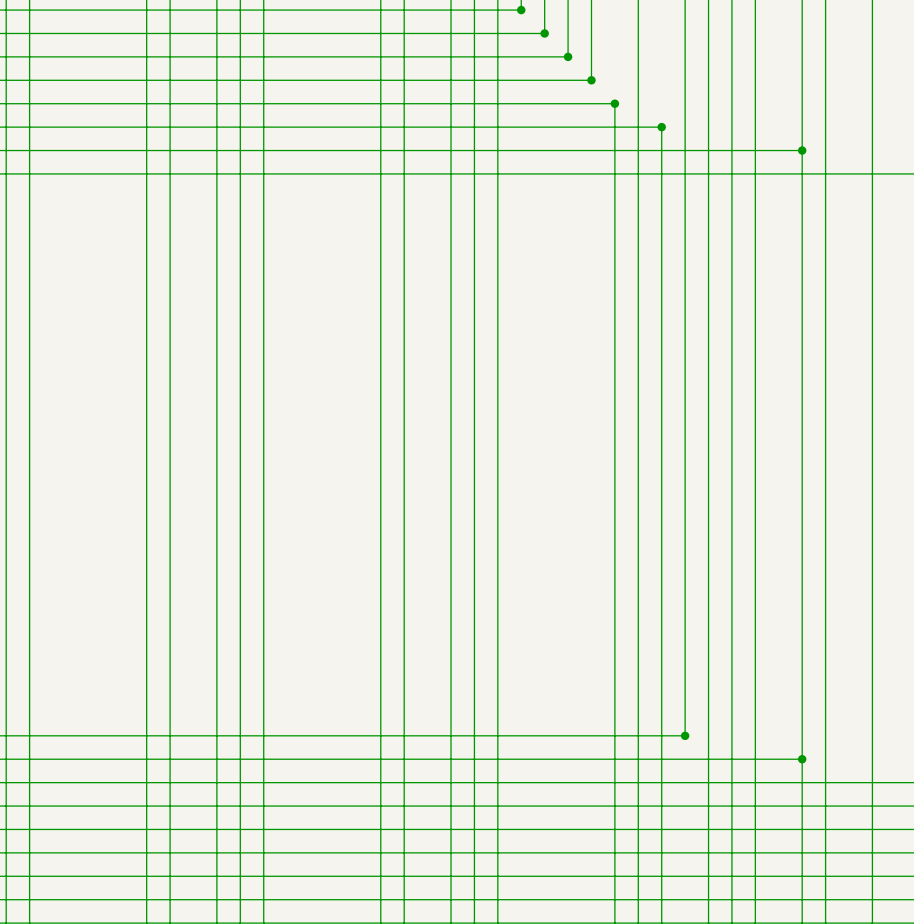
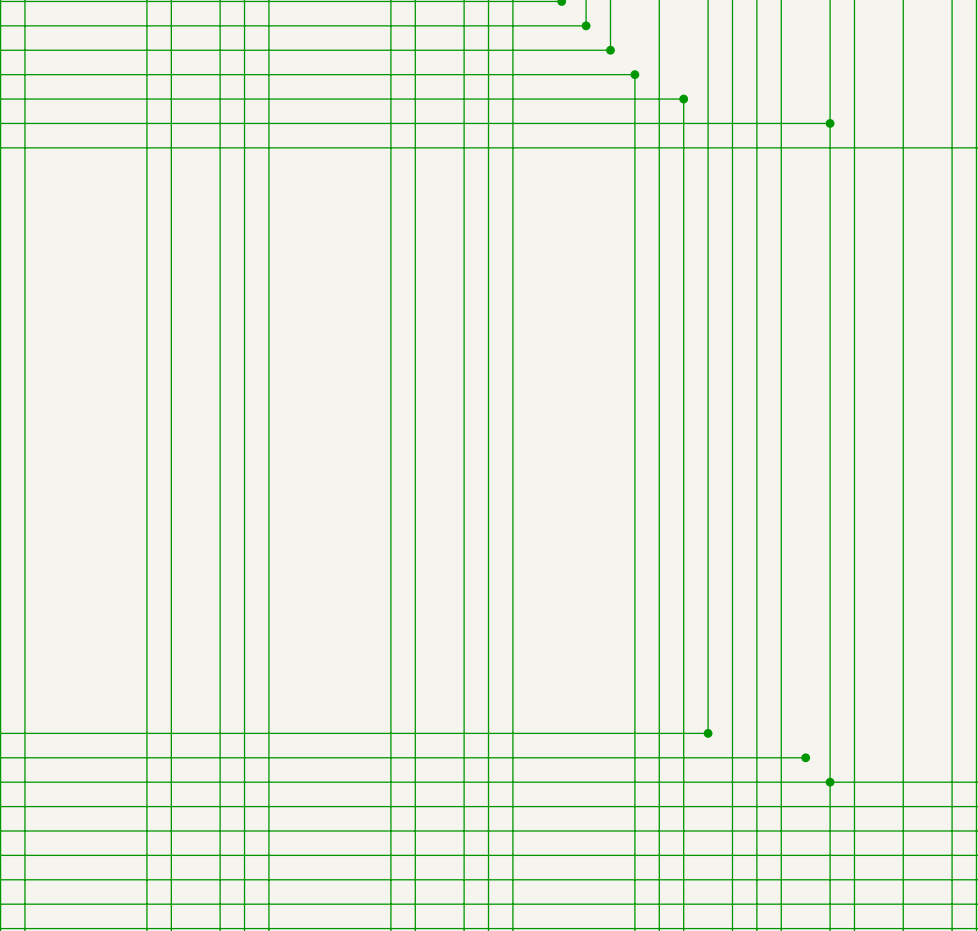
wire: (778, 759) (802, 759) -> none
junction: none -> (805, 757)
junction: (802, 759) -> none
junction: none -> (830, 782)

